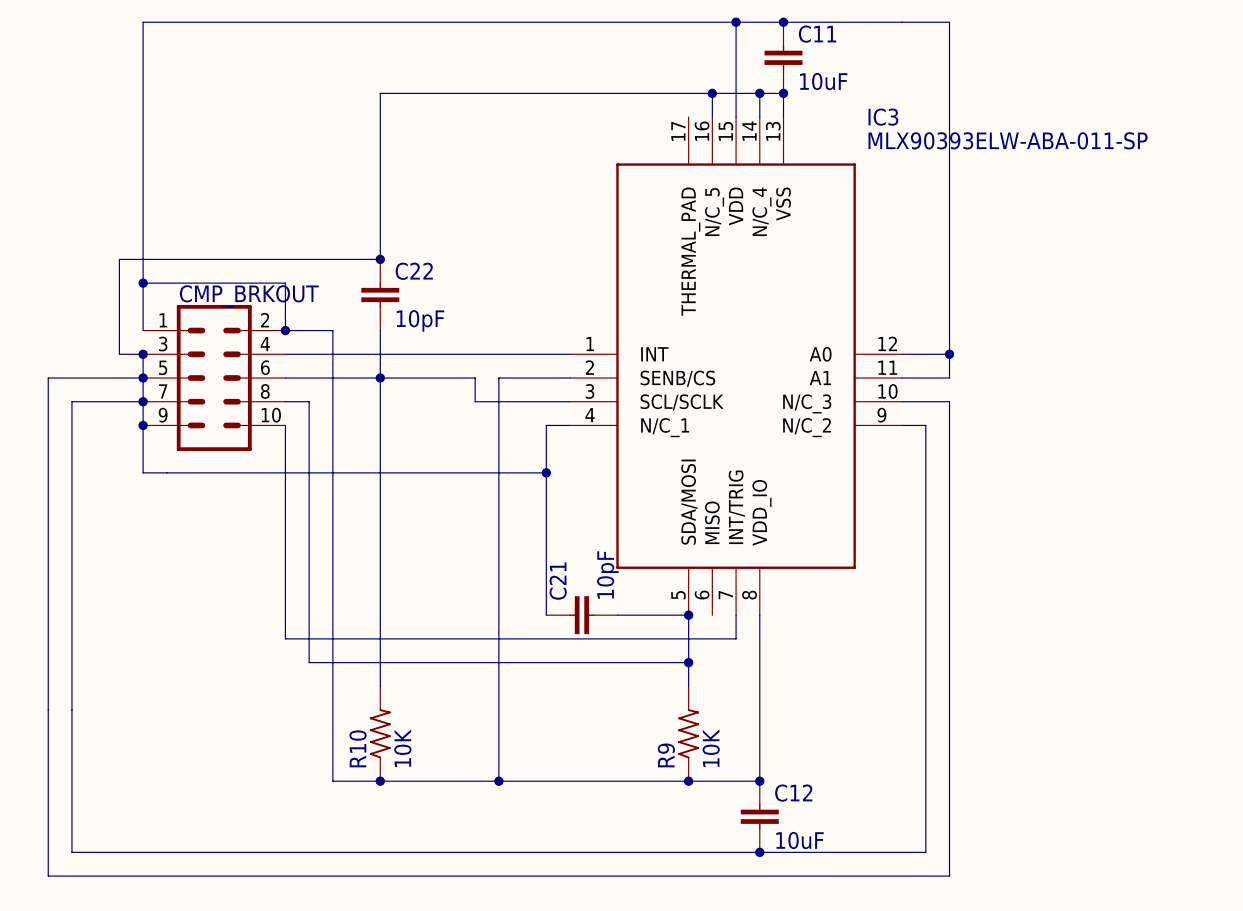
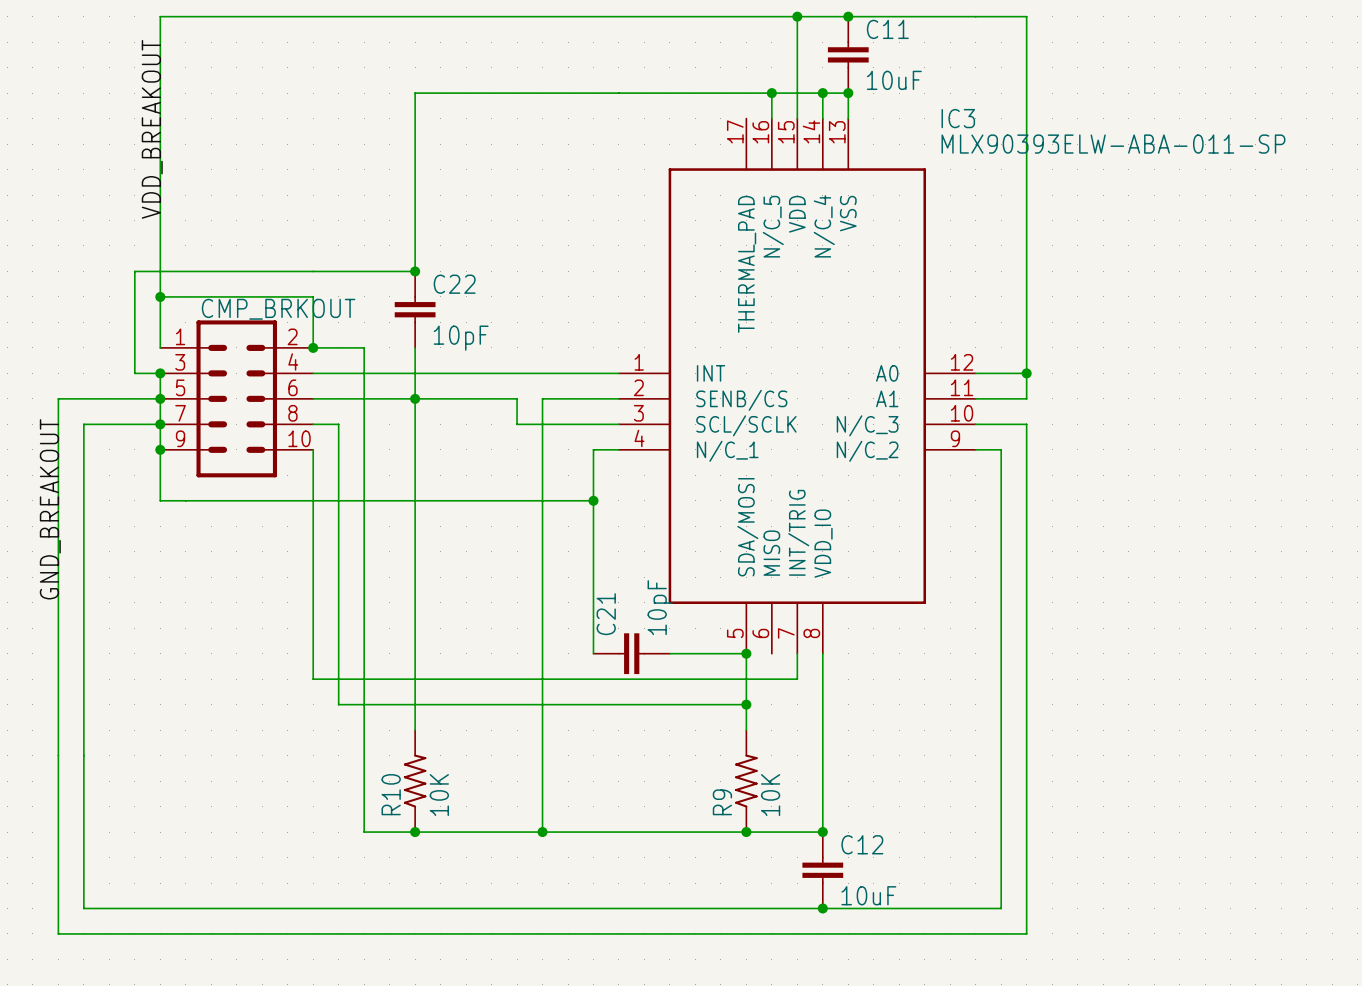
label: none -> VDD_BREAKOUT (152, 129)
label: none -> GND_BREAKOUT (50, 509)

